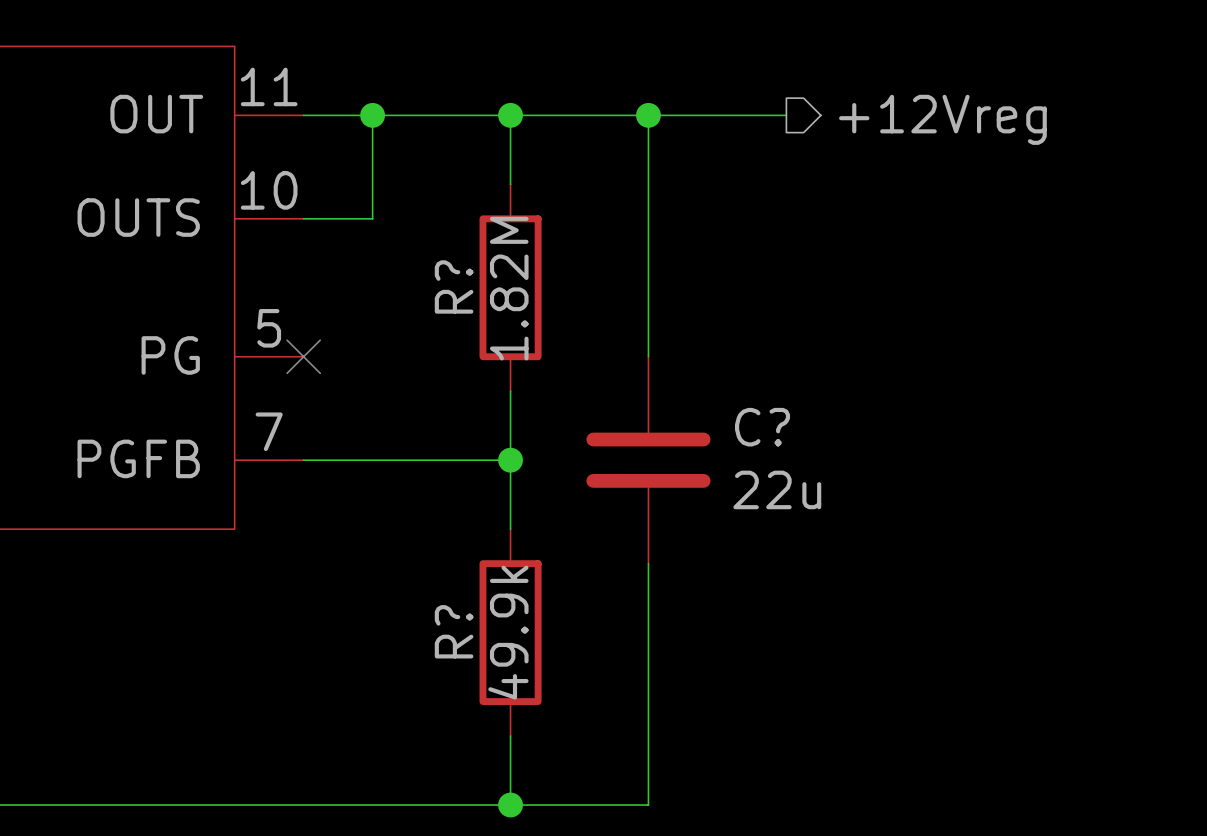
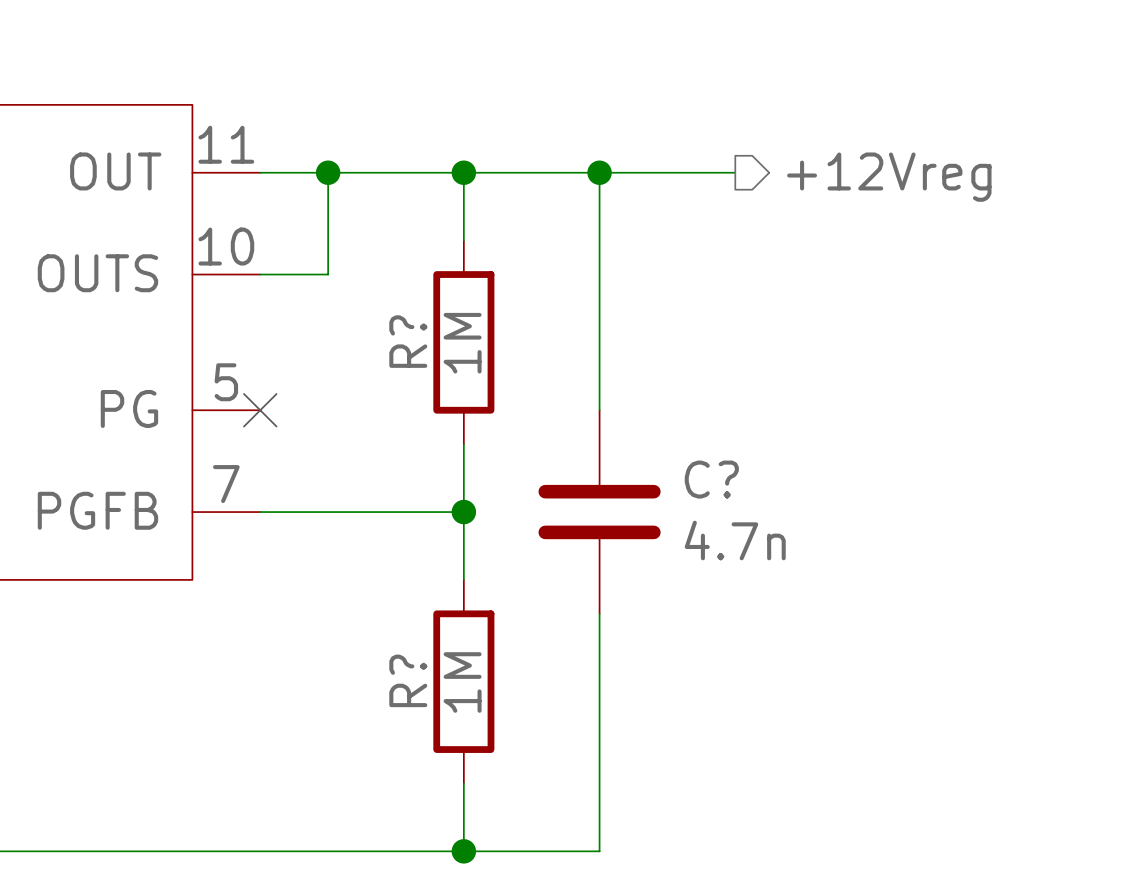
R? value: 1.82M (509, 288) -> 1M (462, 343)
C? value: 22u (777, 489) -> 4.7n (735, 540)
R? value: 49.9k (508, 632) -> 1M (462, 682)

